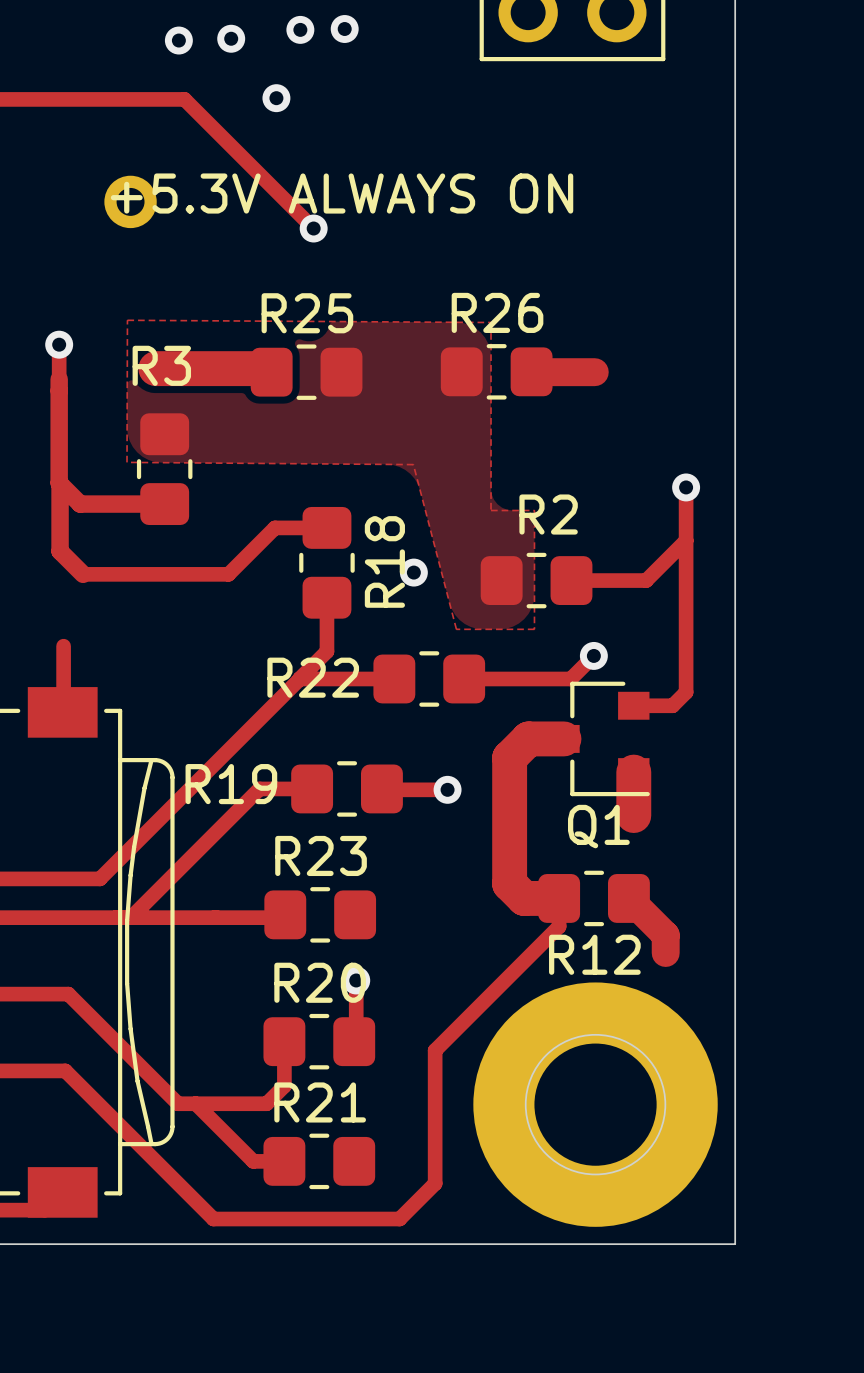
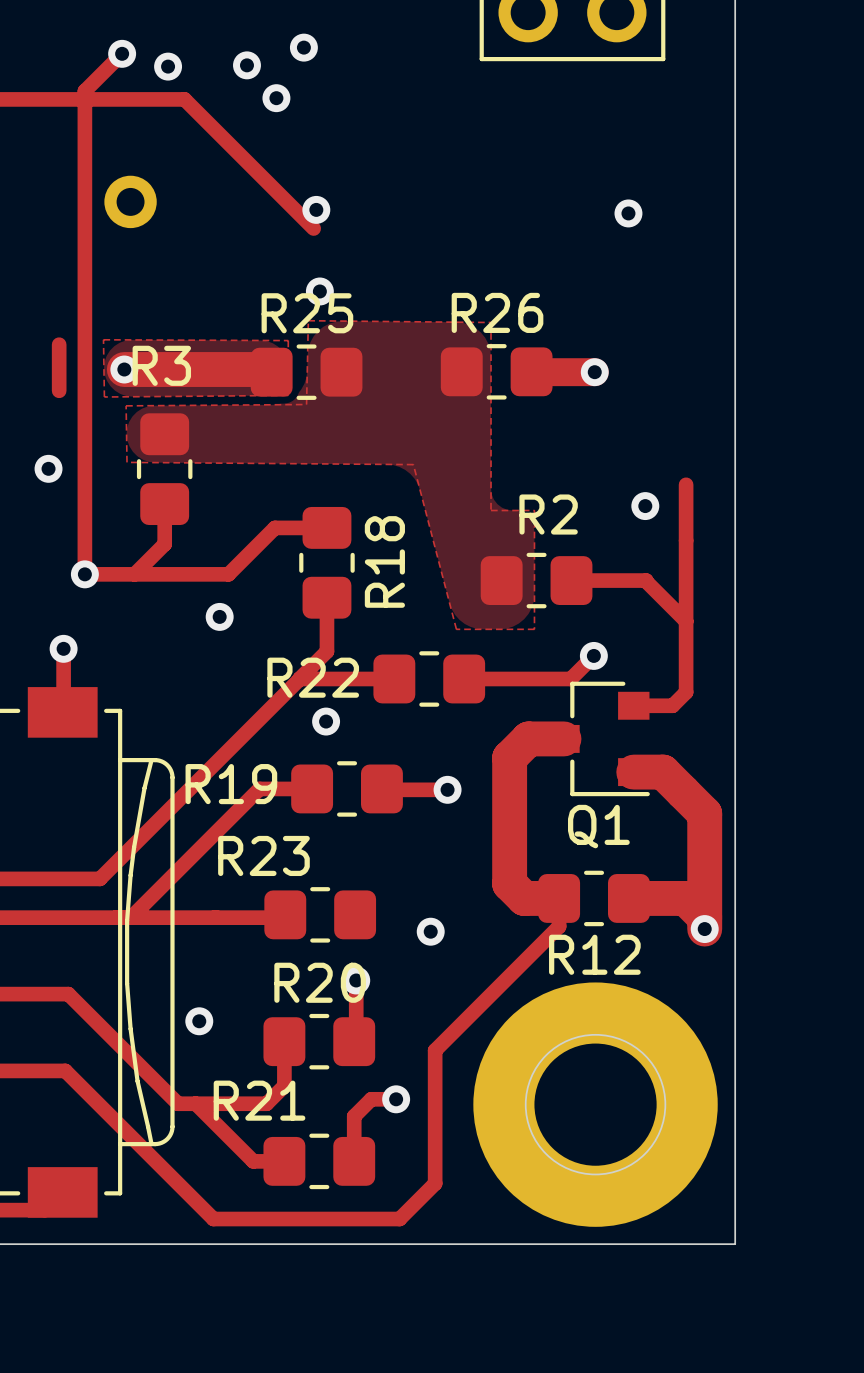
via position: (300, 29) -> (303, 47)
via: (344, 29) -> none
via position: (231, 38) -> (246, 65)
via position: (178, 40) -> (168, 66)
track: none -> (122, 53) (84, 91) (84, 574)
via: none -> (122, 53)
text: +5.3V ALWAYS ON (342, 193) -> none
via: none -> (628, 213)
via position: (313, 228) -> (316, 209)
via: none -> (319, 291)
zone outline: (491, 322) (127, 320) (127, 462) -> (491, 322) (308, 320) (306, 404) (126, 405) (127, 462)
zone outline: none -> (103, 339) (104, 397) (288, 395) (288, 340) (103, 339)
via: (59, 344) -> none
track: (155, 368) (268, 368) -> (124, 369) (269, 369)
via: none -> (124, 369)
via: none -> (594, 372)
track: (59, 379) (59, 483) (80, 504) (164, 504) -> (134, 574) (164, 544) (164, 504)
via: none -> (48, 468)
track: (60, 483) (60, 551) (83, 574) -> none
via position: (686, 487) -> (645, 506)
track: (686, 540) (646, 580) -> (686, 621) (646, 580)
via: (413, 572) -> none
via: none -> (84, 574)
via: none -> (219, 616)
via: none -> (63, 648)
via: none -> (326, 721)
track: (633, 772) (633, 815) -> (633, 772) (663, 772) (704, 813) (704, 929) (704, 917) (685, 898) (628, 898)
R23 name position: R23 (321, 855) -> R23 (263, 855)
track: (628, 898) (665, 935) (665, 952) -> none
via: none -> (704, 929)
via: none -> (430, 931)
via: none -> (199, 1021)
track: none -> (396, 1099) (371, 1099) (354, 1116) (354, 1161)
via: none -> (396, 1099)
R21 name position: R21 (320, 1102) -> R21 (259, 1100)

